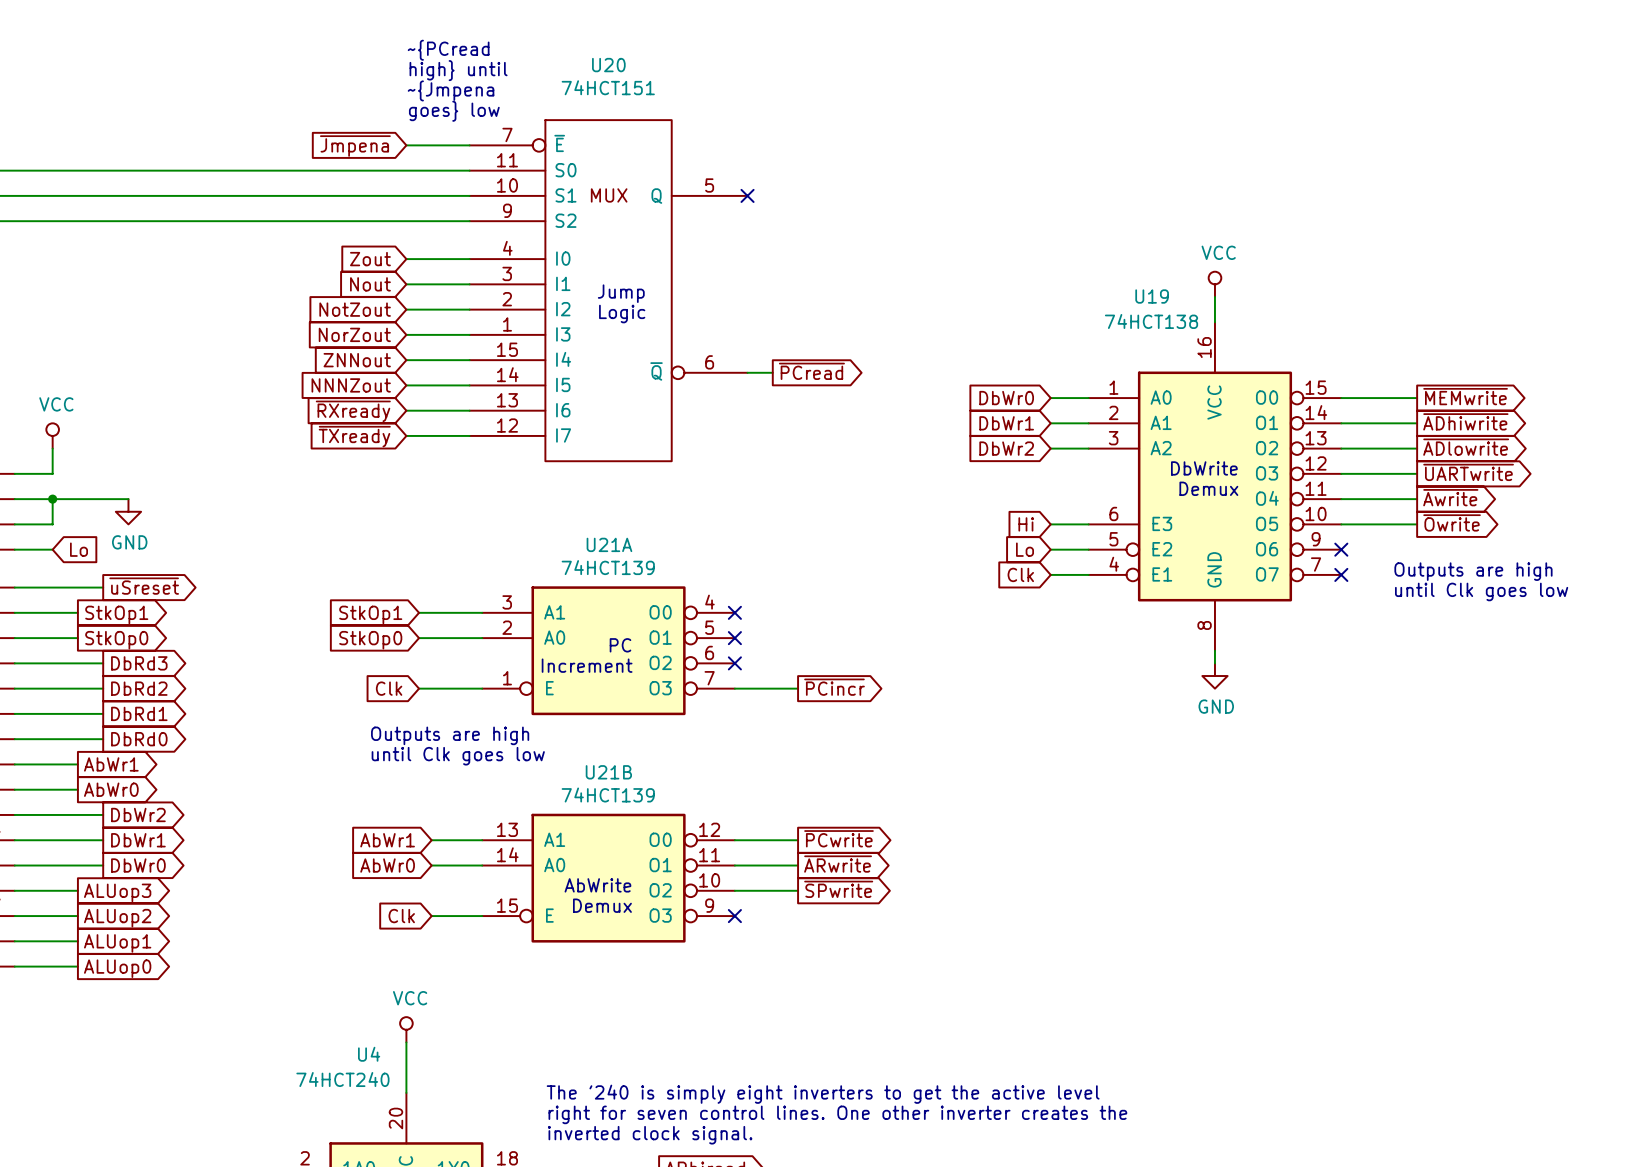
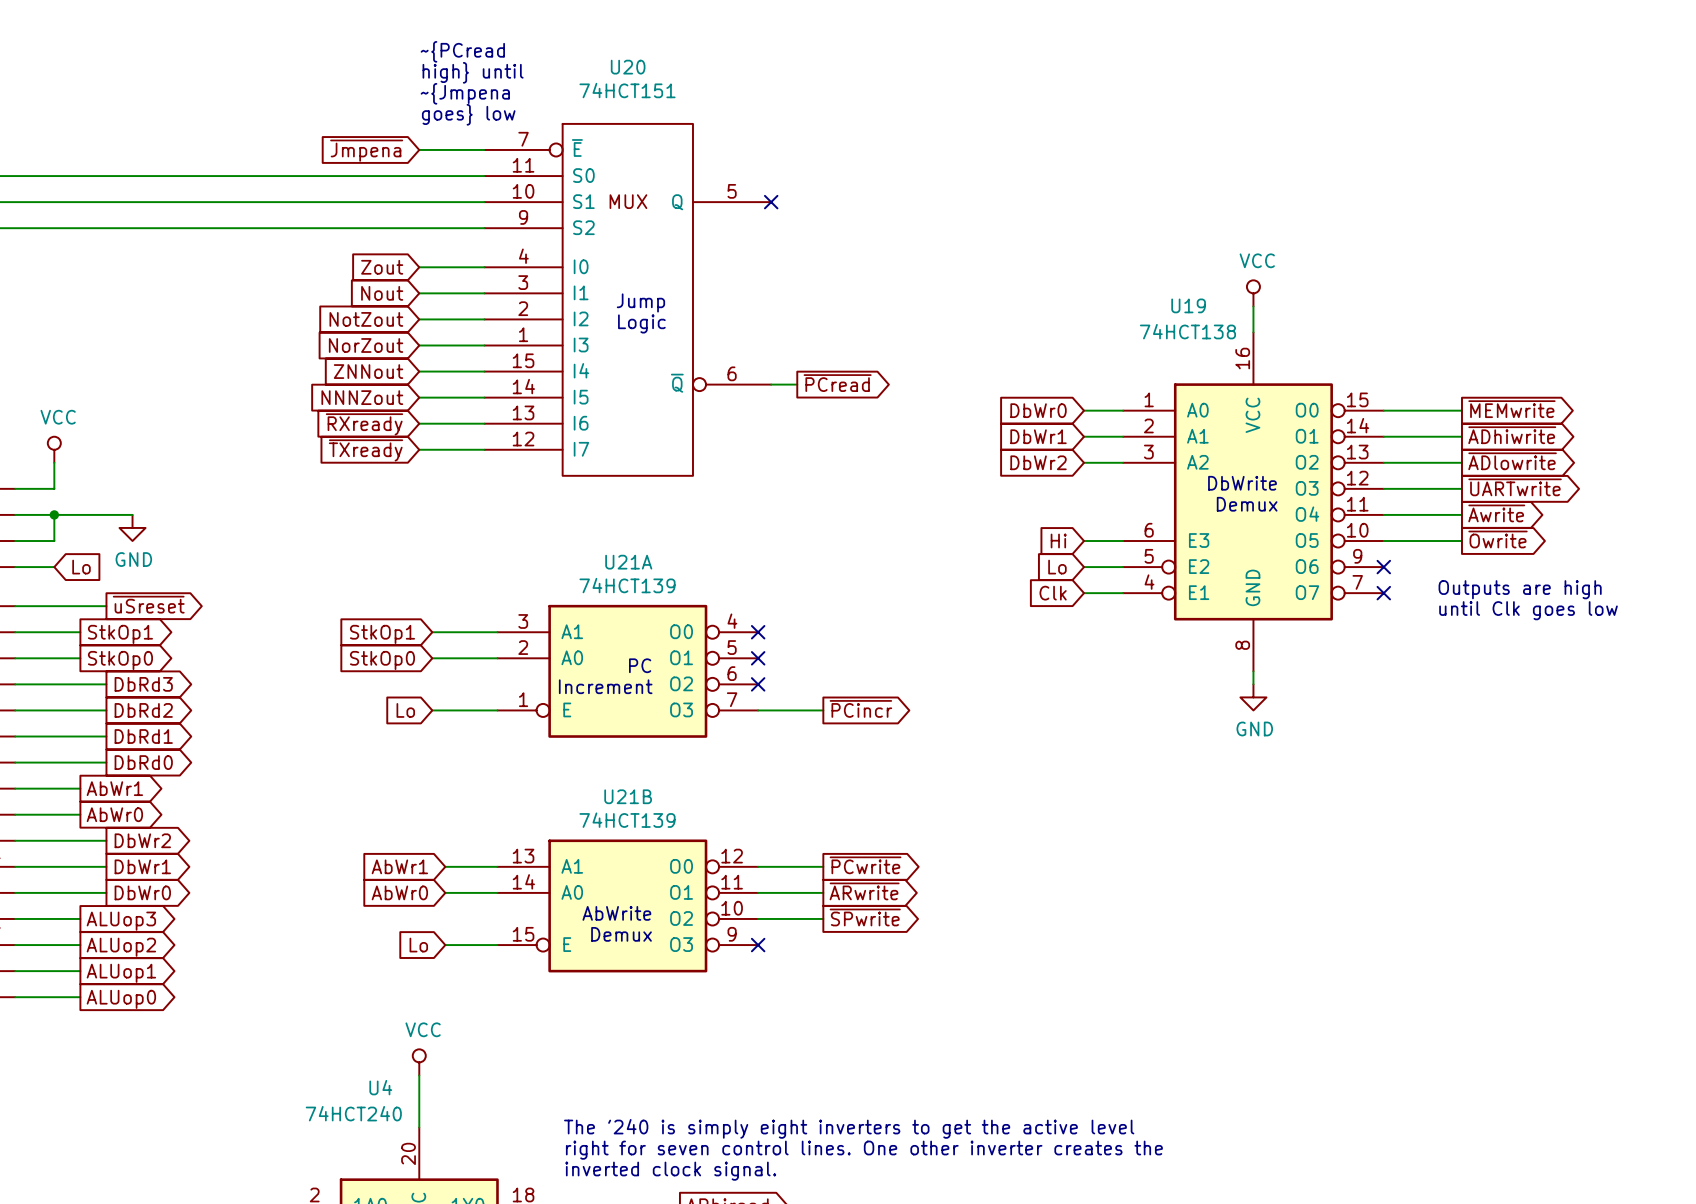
global label: Clk (389, 688) -> Lo (405, 710)
text: Outputs are high (450, 735) -> none
text: until Clk goes low (458, 756) -> none
global label: Clk (401, 916) -> Lo (418, 945)

